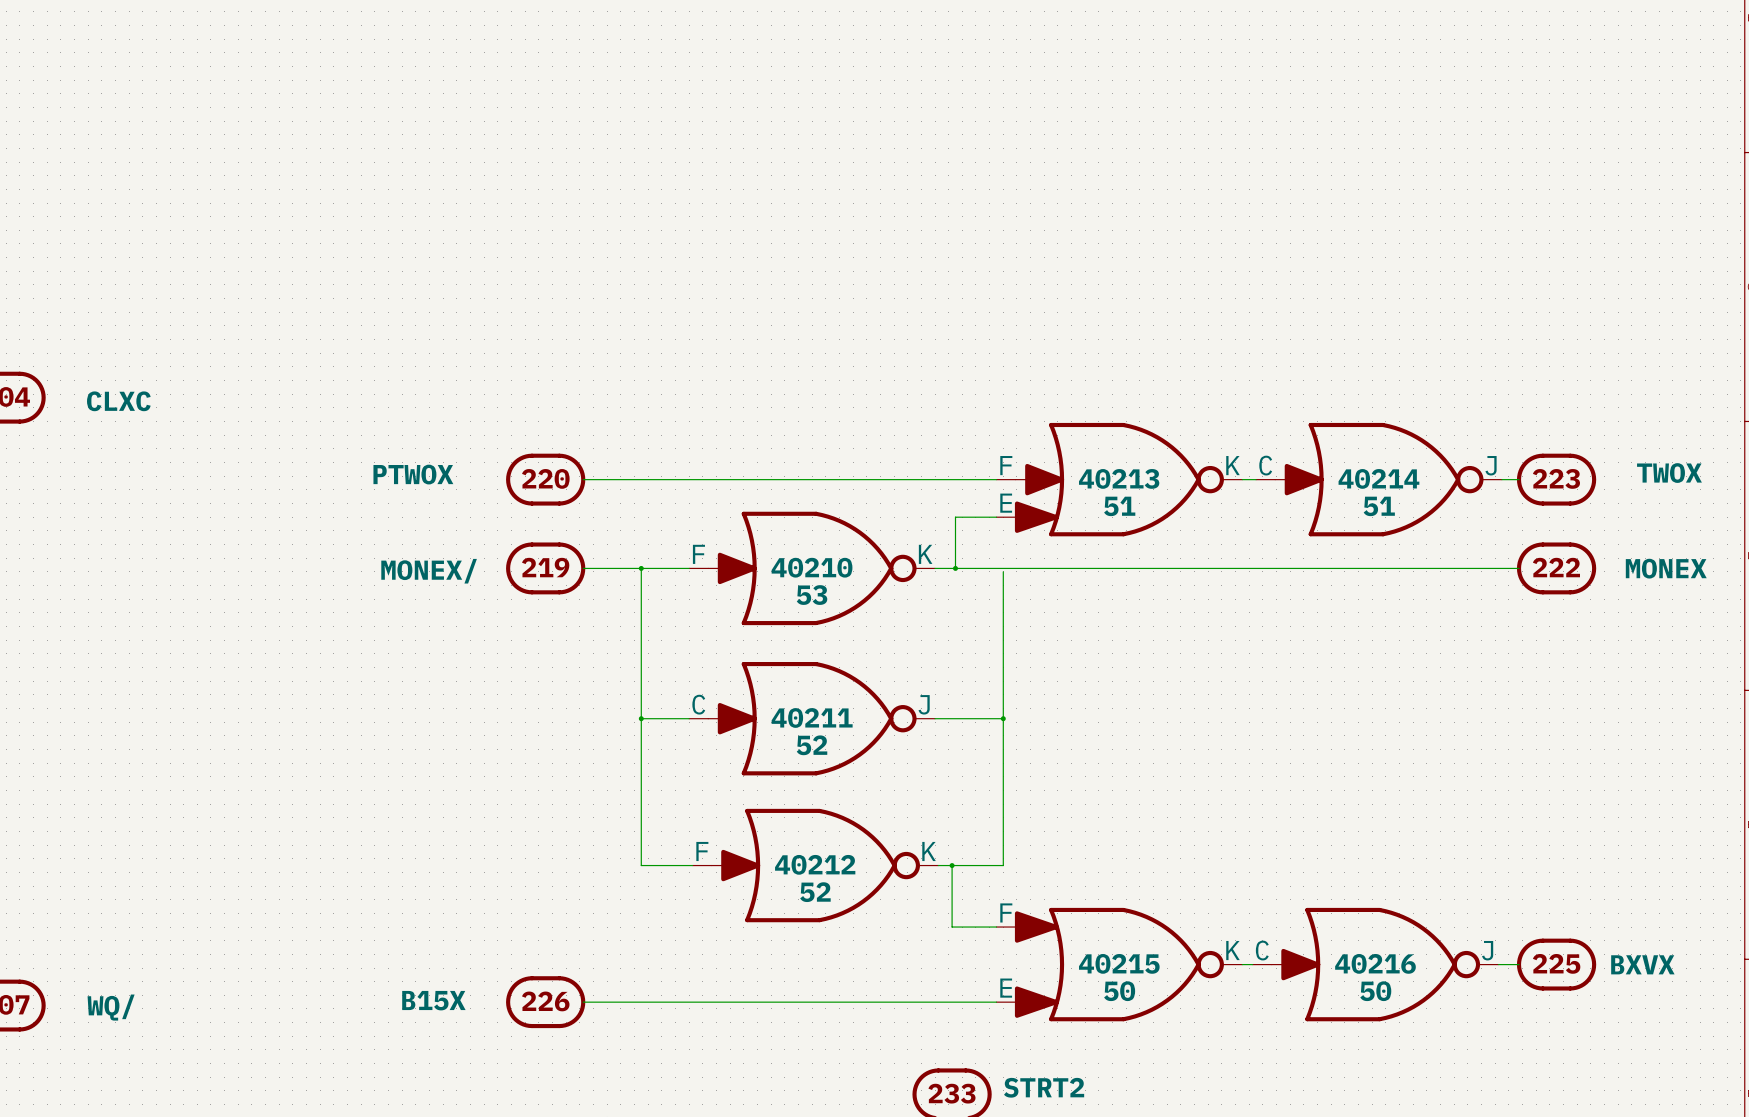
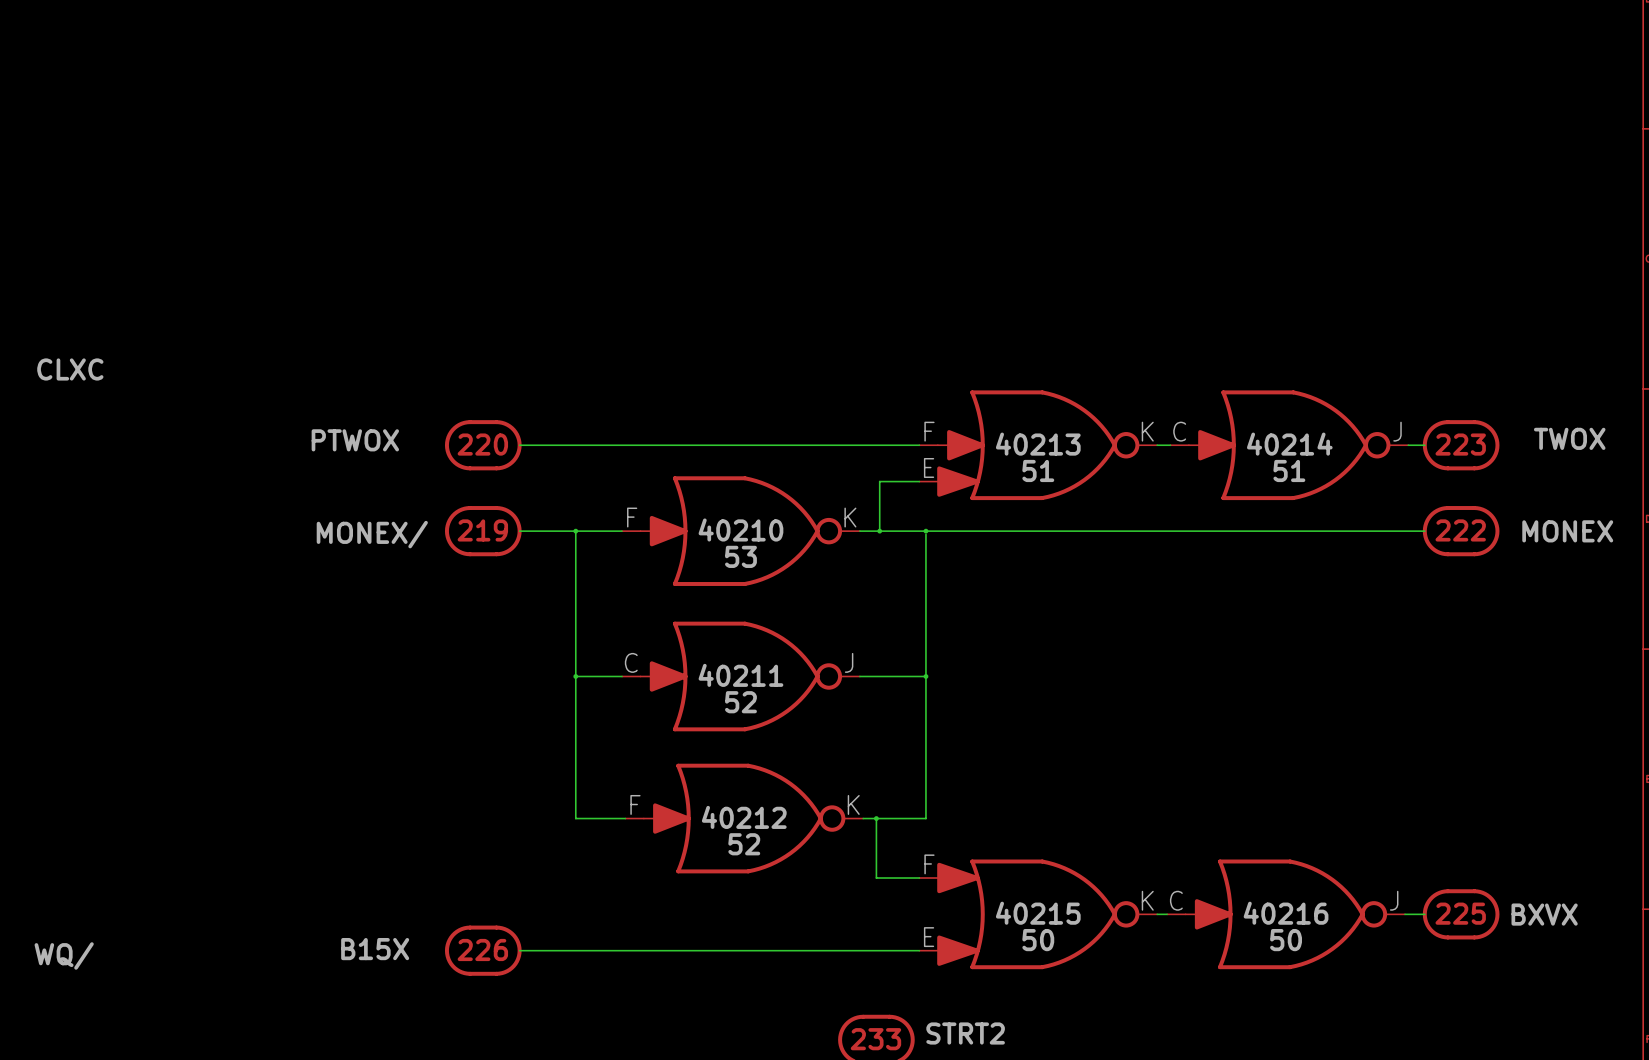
junction: none -> (925, 531)

